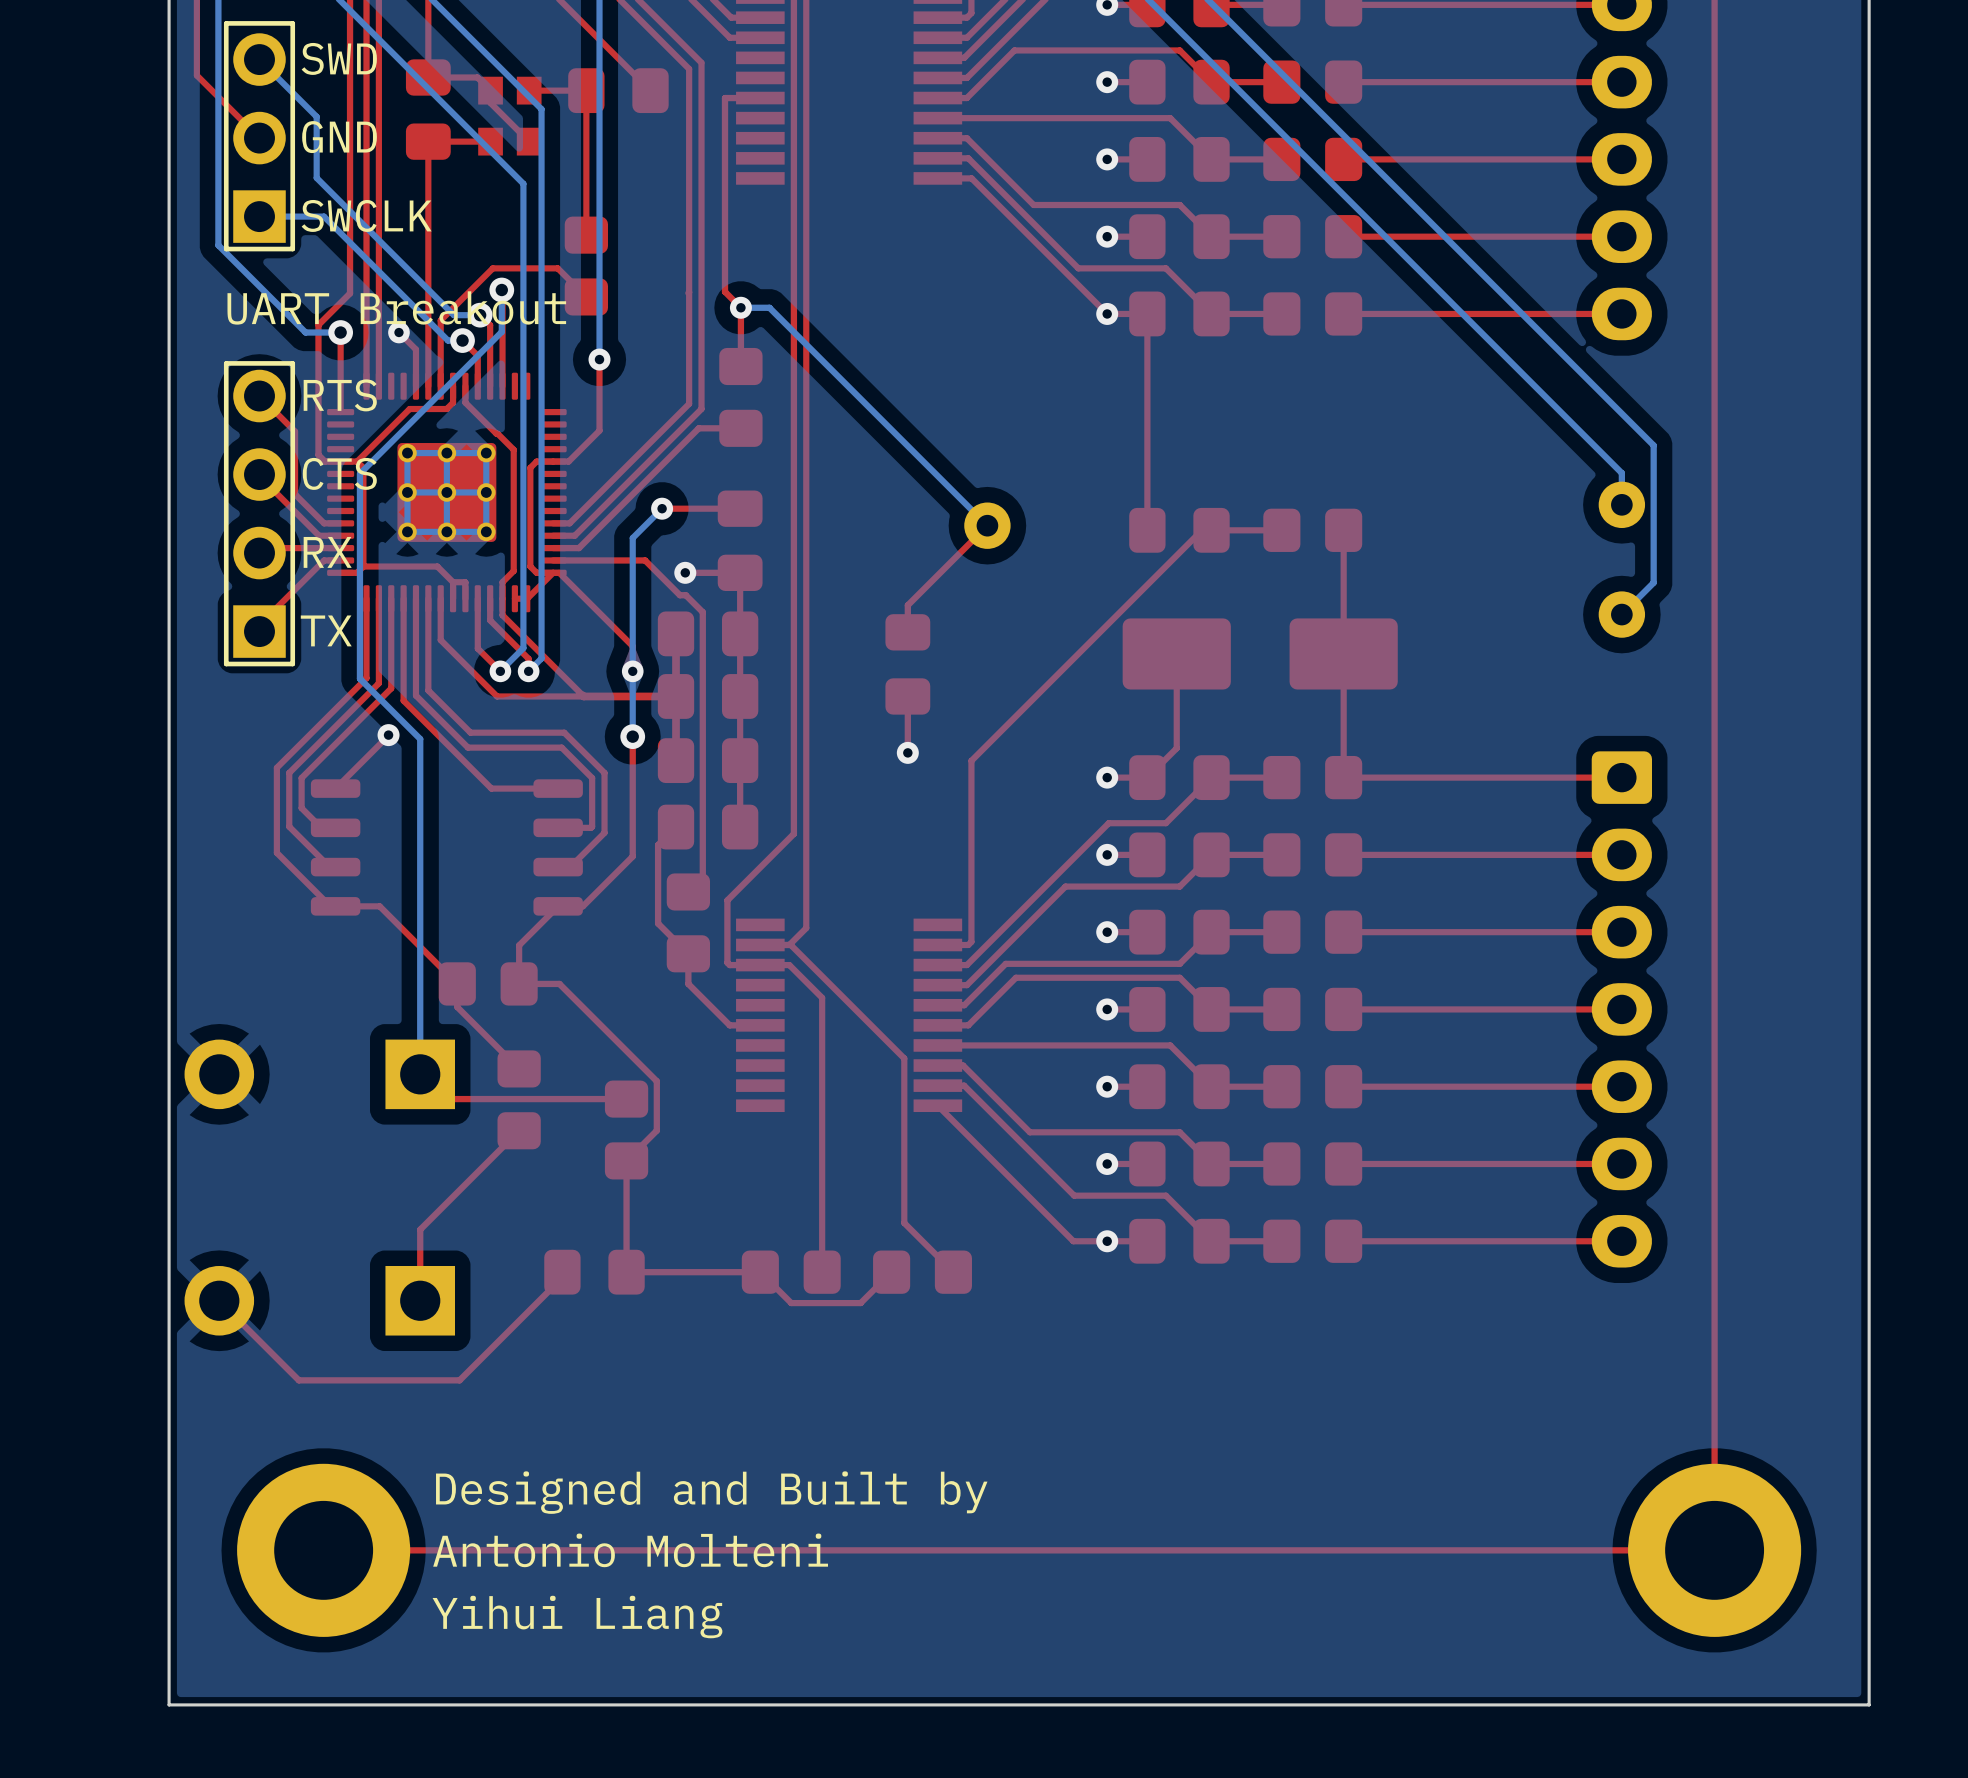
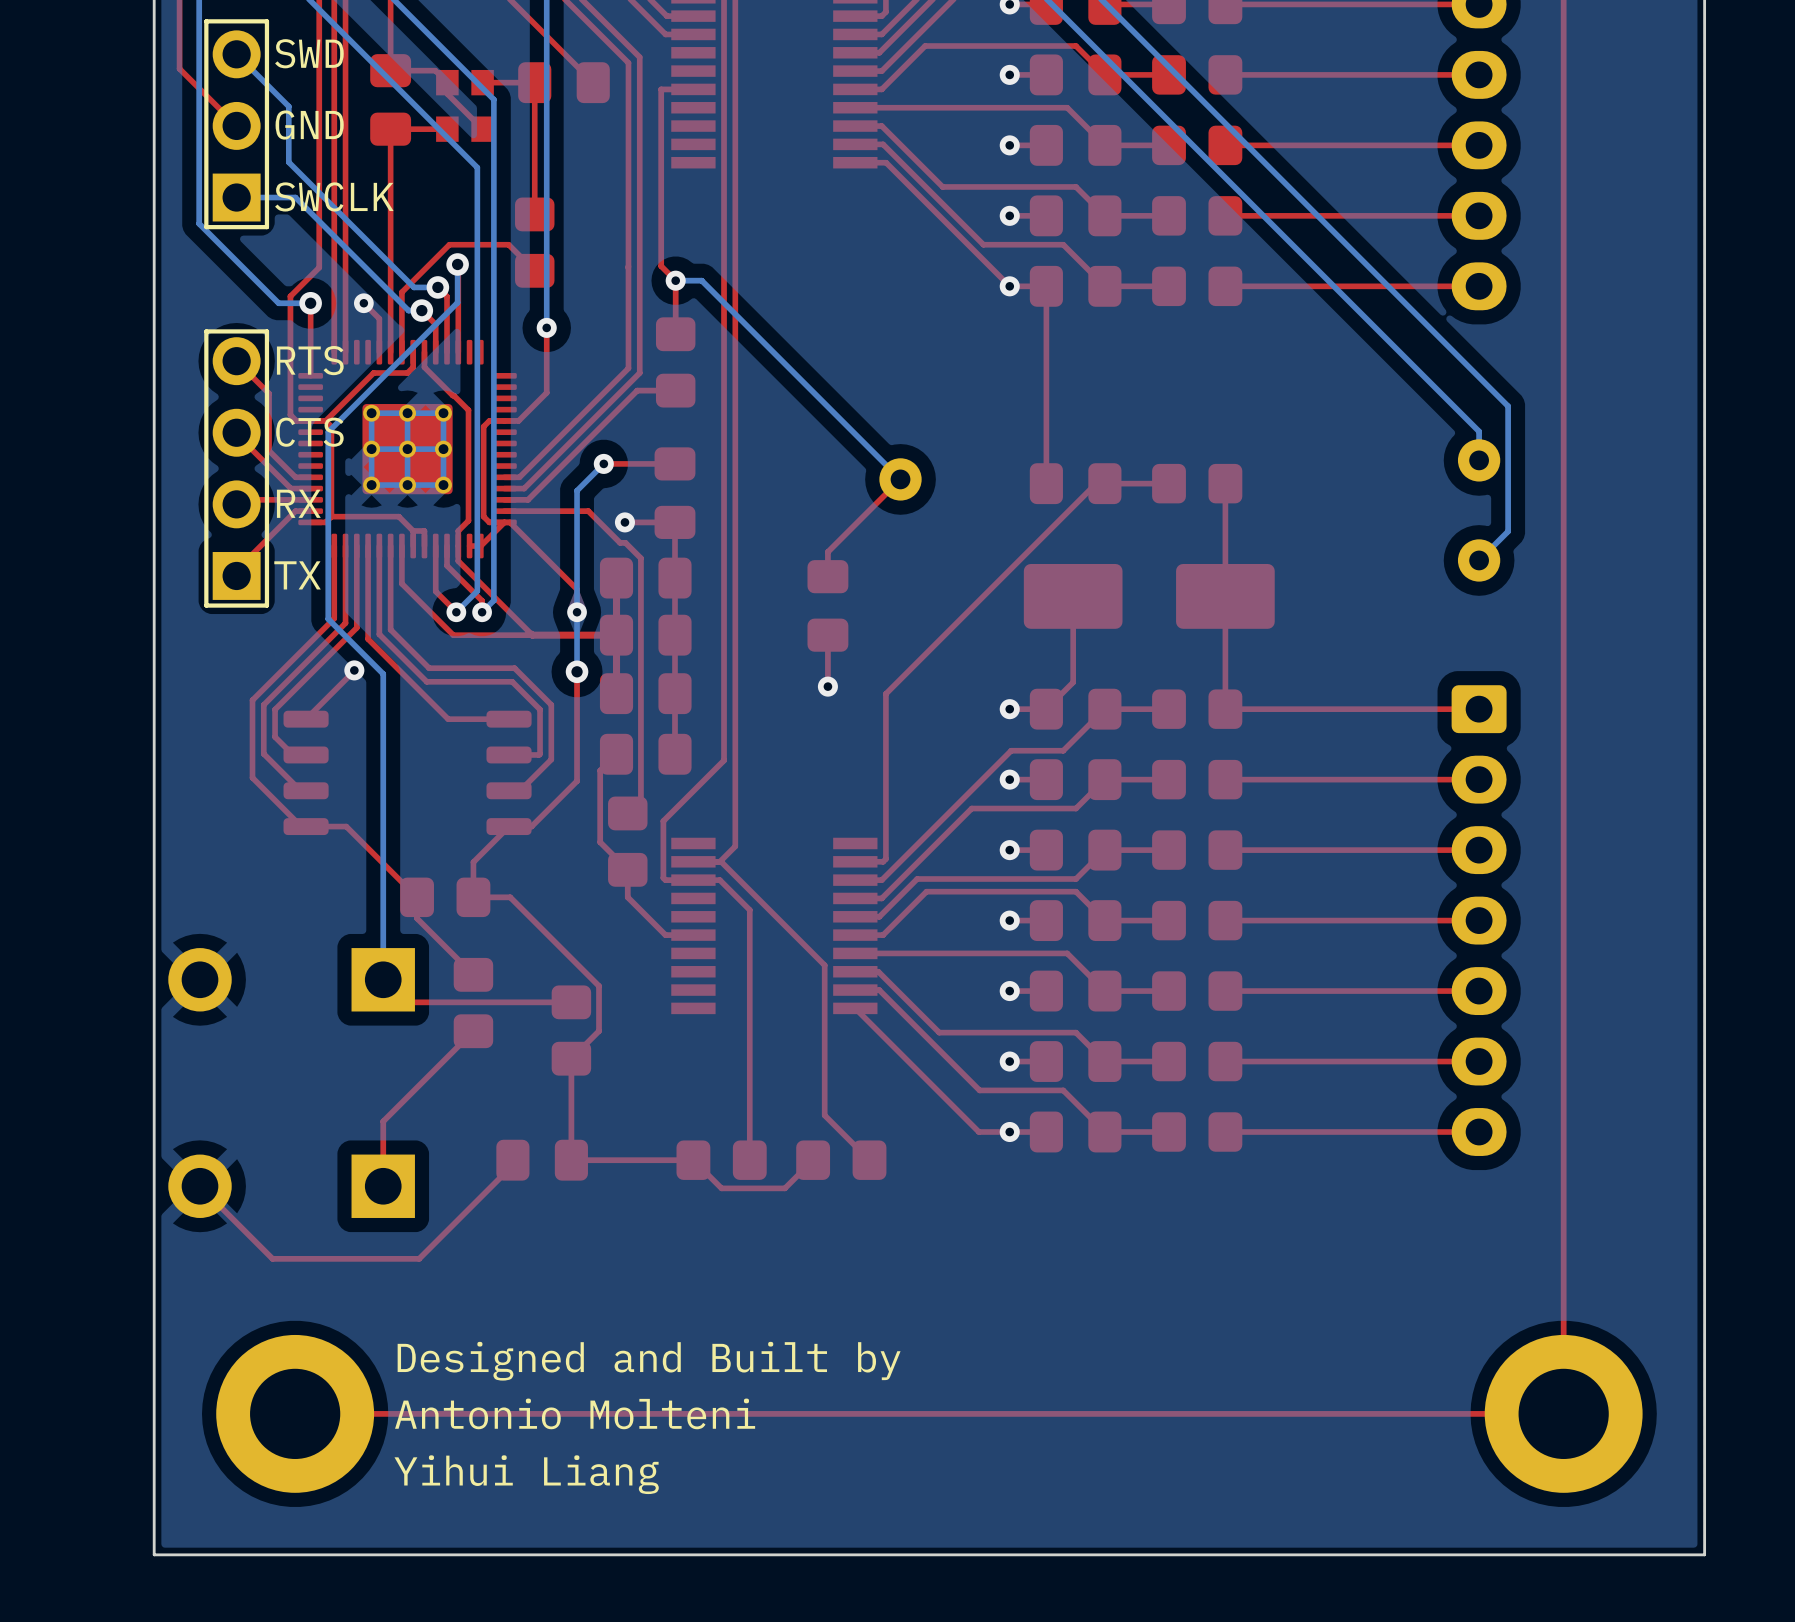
text: UART Breakout (396, 307) -> none

